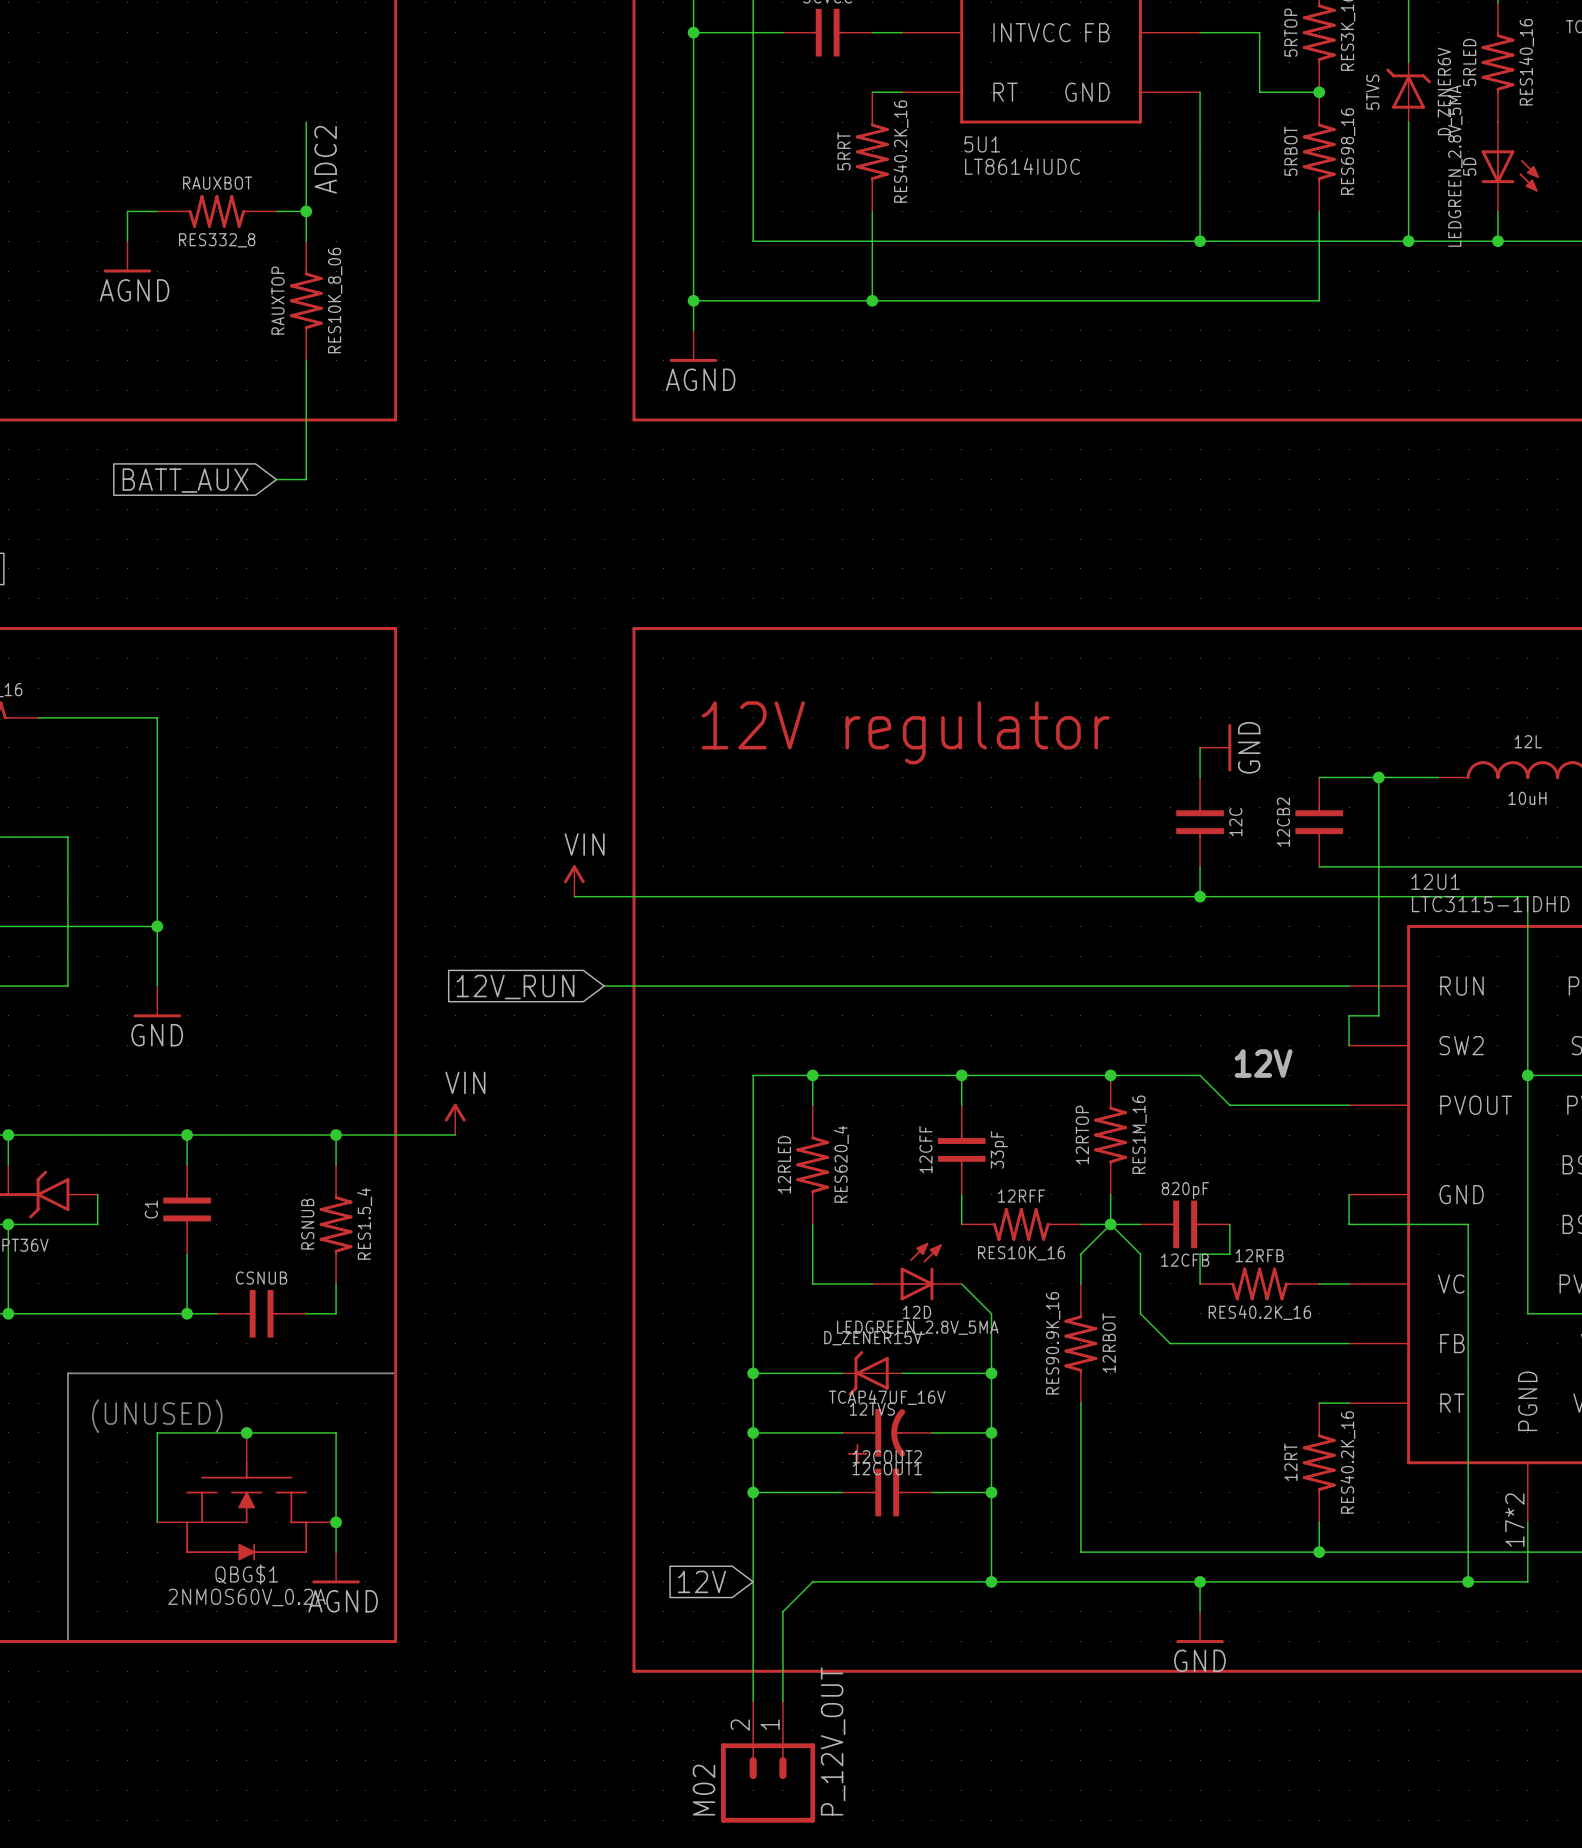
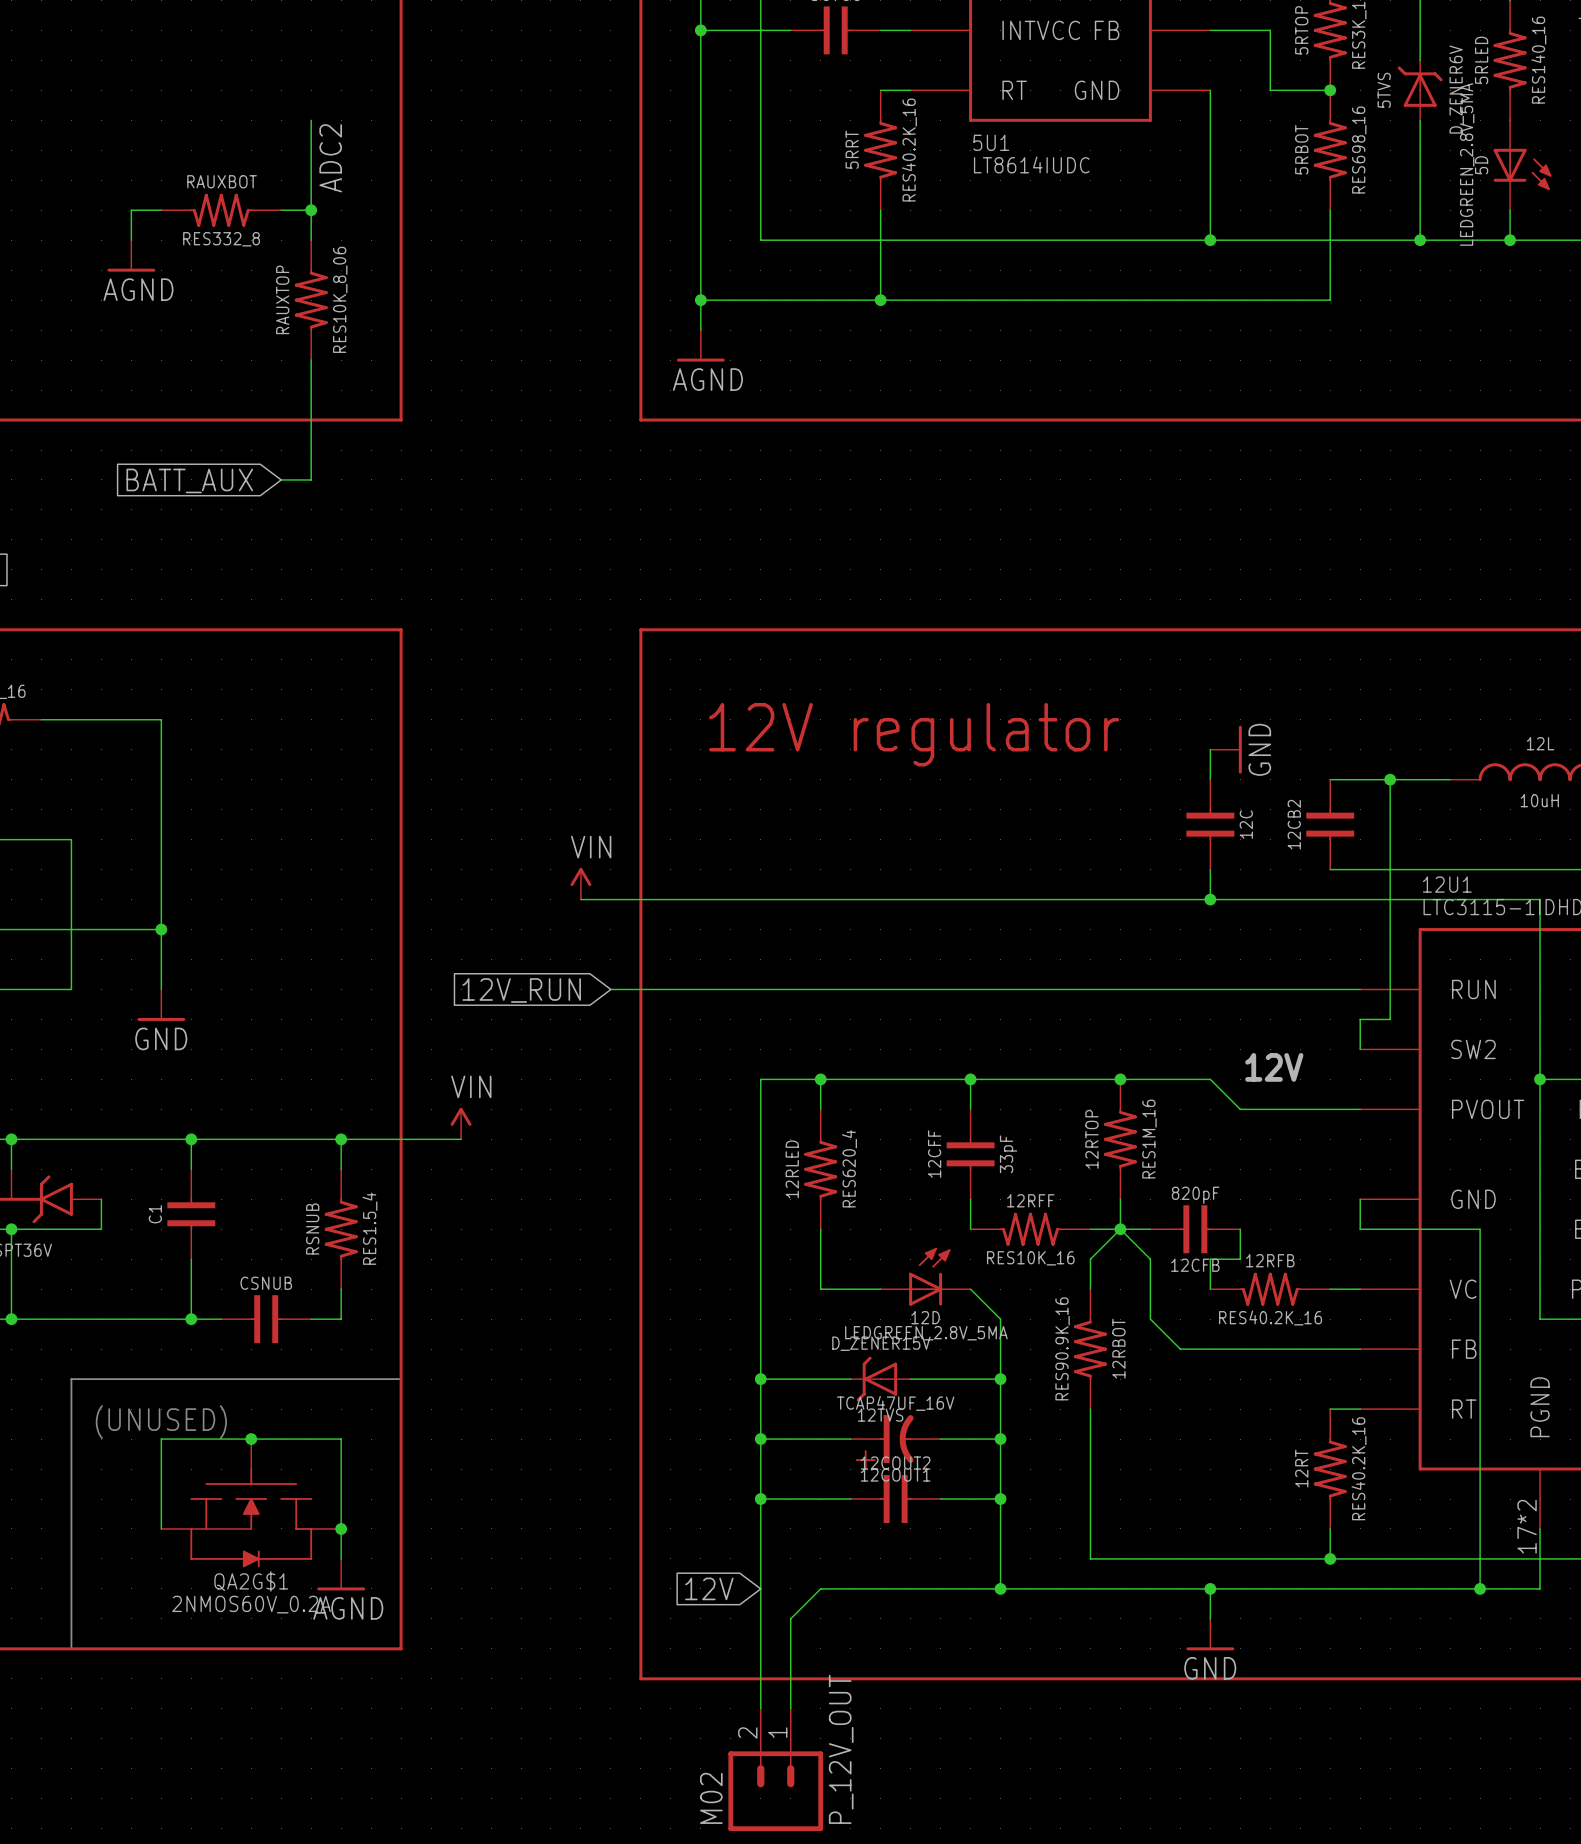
QBG$1 name: QBG$1 (246, 1574) -> QA2G$1 (251, 1581)

